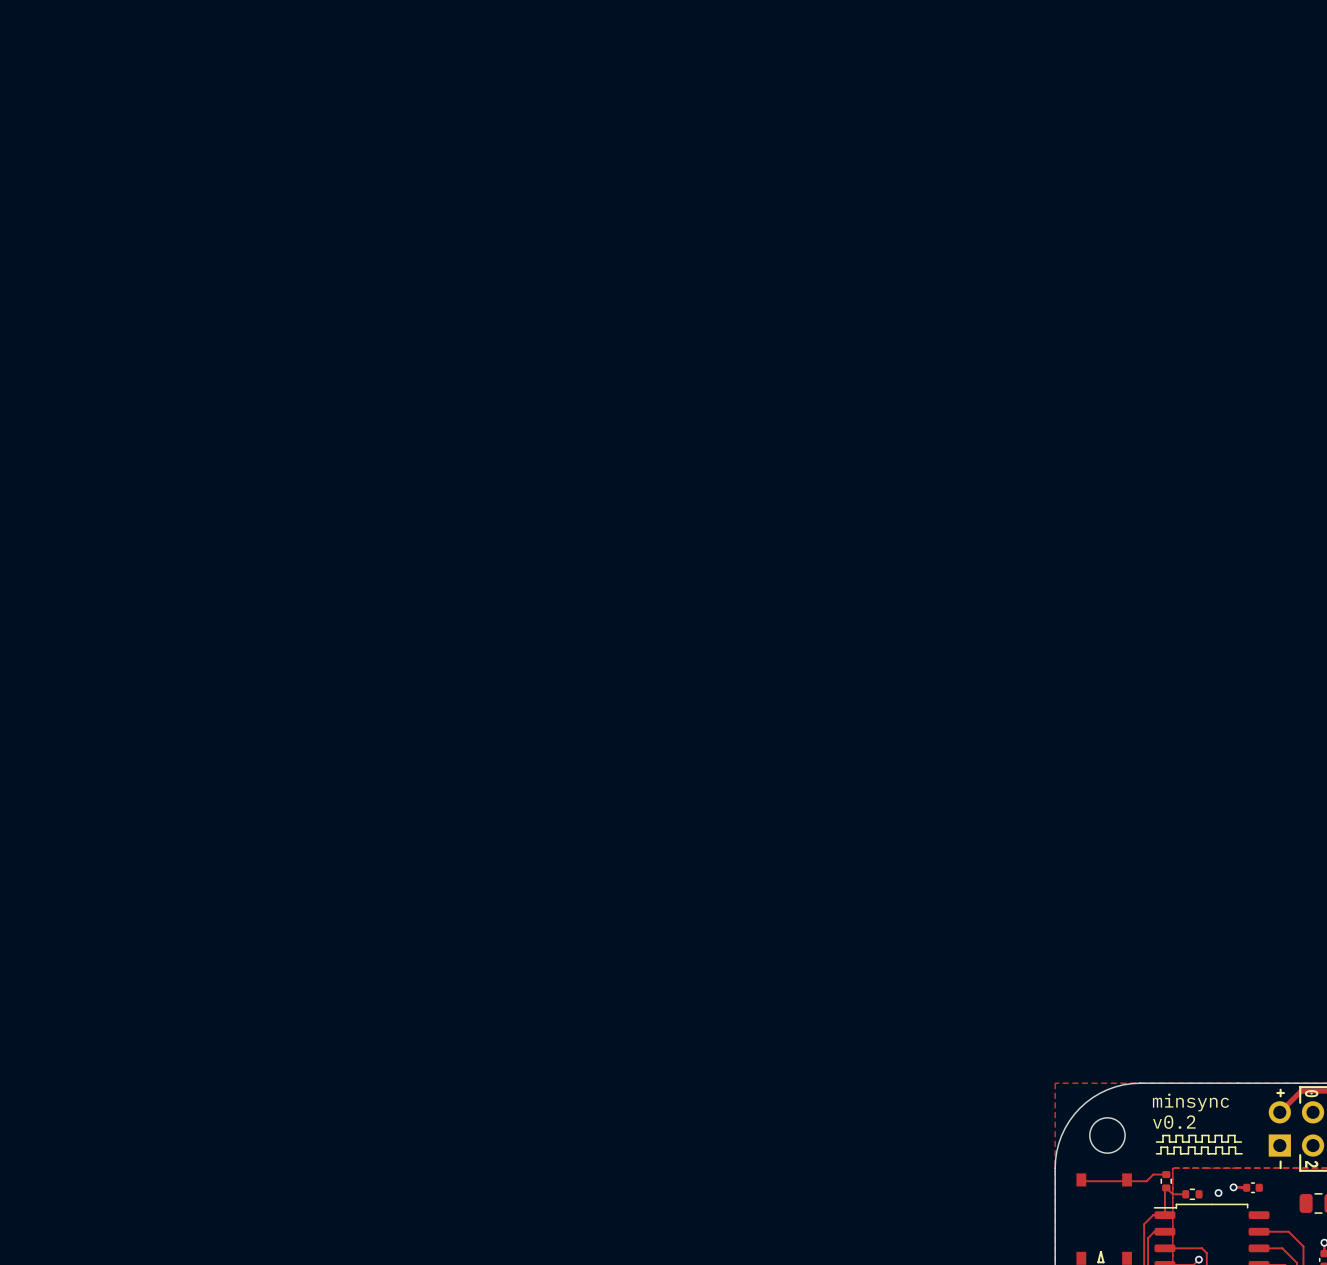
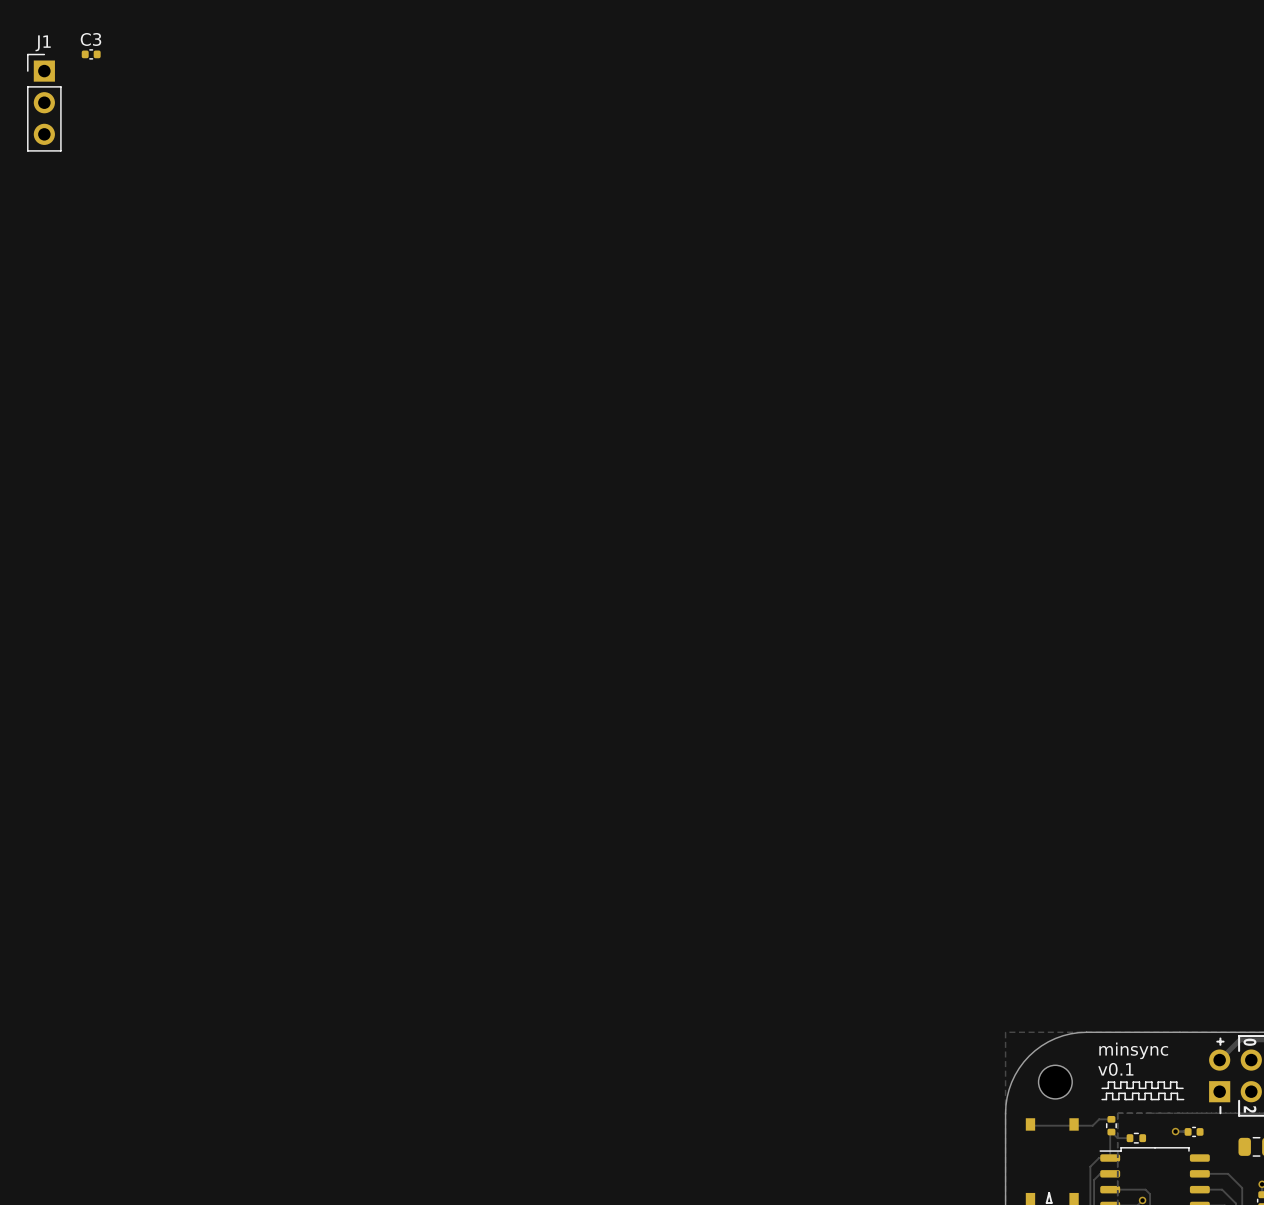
C3: none -> (91, 54)
J1: none -> (44, 102)
text: v0.2 (1174, 1122) -> v0.1 (1115, 1069)
via: (1218, 1192) -> none

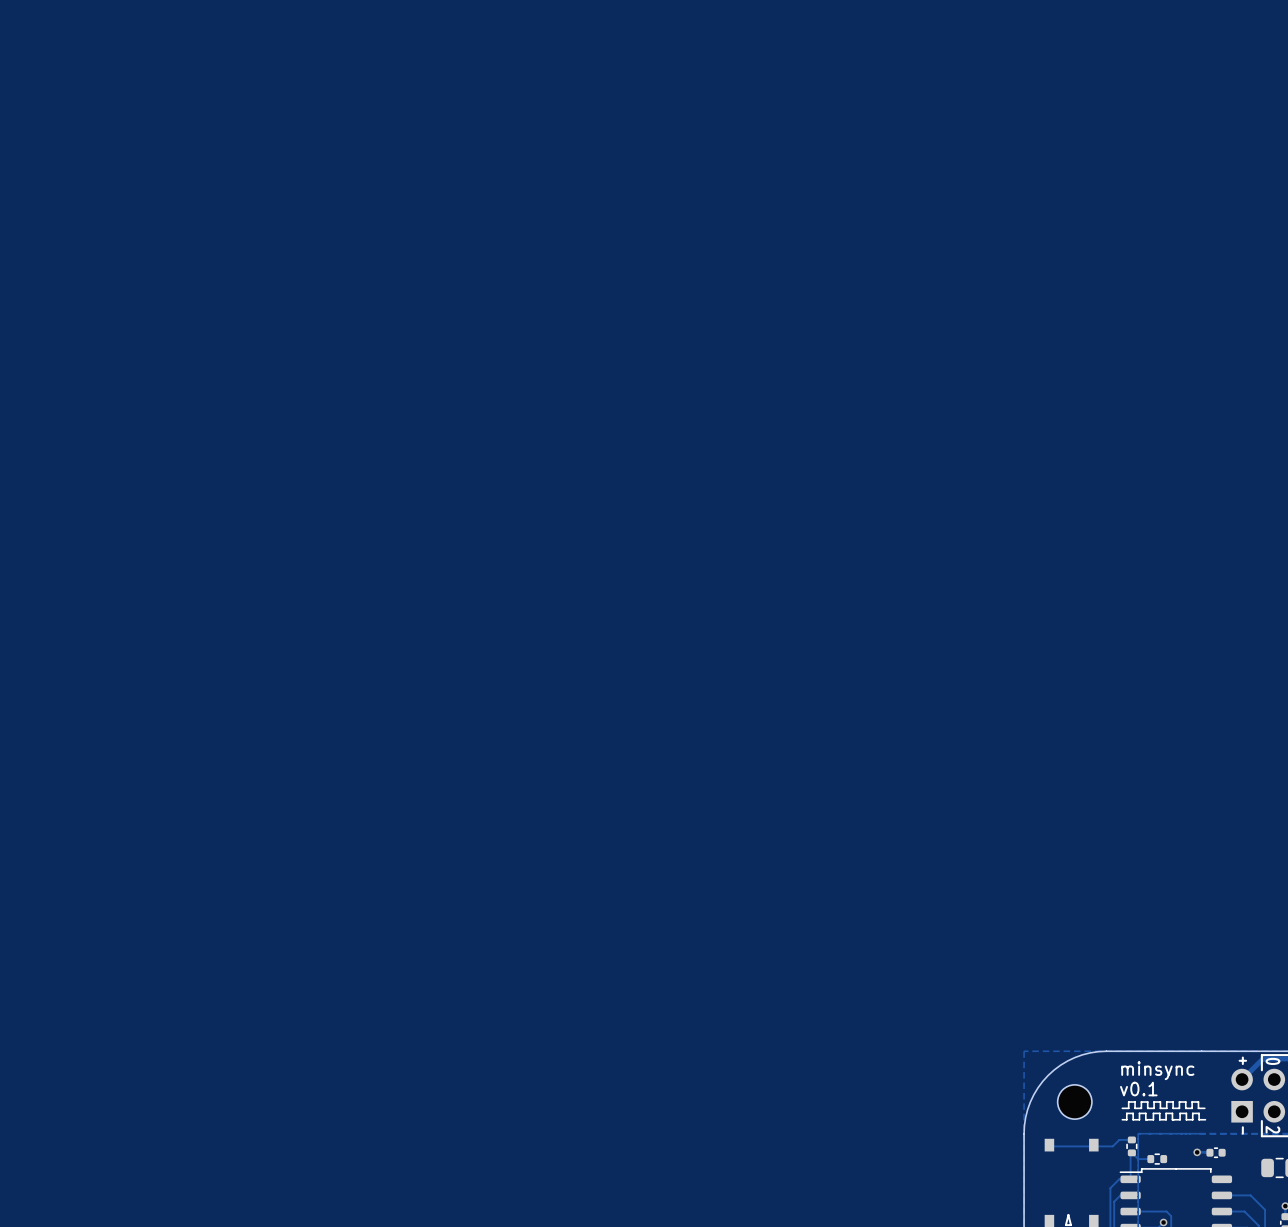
C3: (91, 54) -> none
J1: (44, 102) -> none

